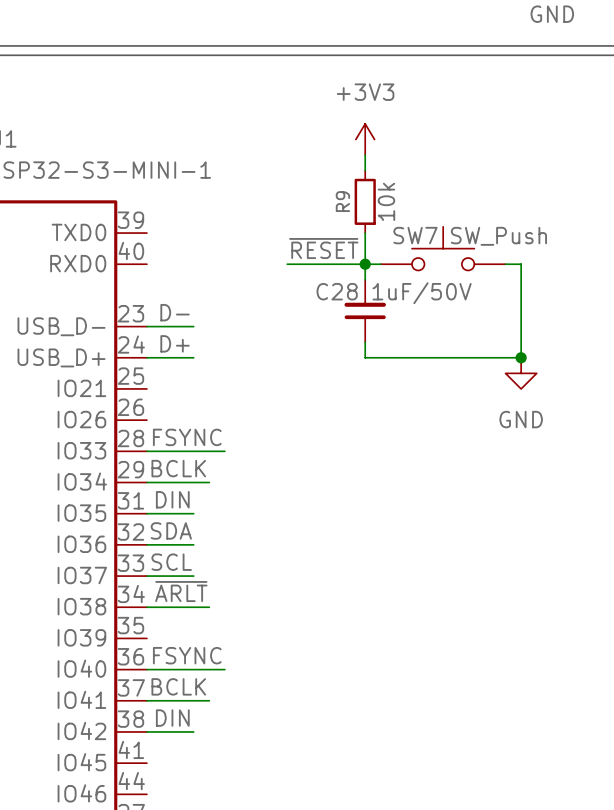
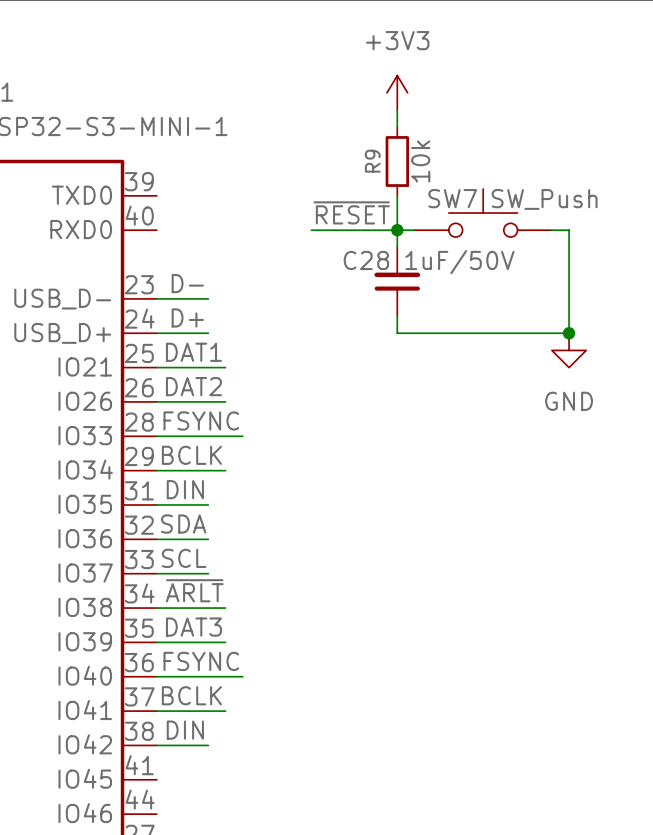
label: none -> DAT1 (193, 352)
wire: none -> (156, 367) (225, 367)
label: none -> DAT2 (193, 386)
wire: none -> (156, 401) (225, 401)
label: none -> DAT3 (193, 627)
wire: none -> (156, 642) (225, 642)

